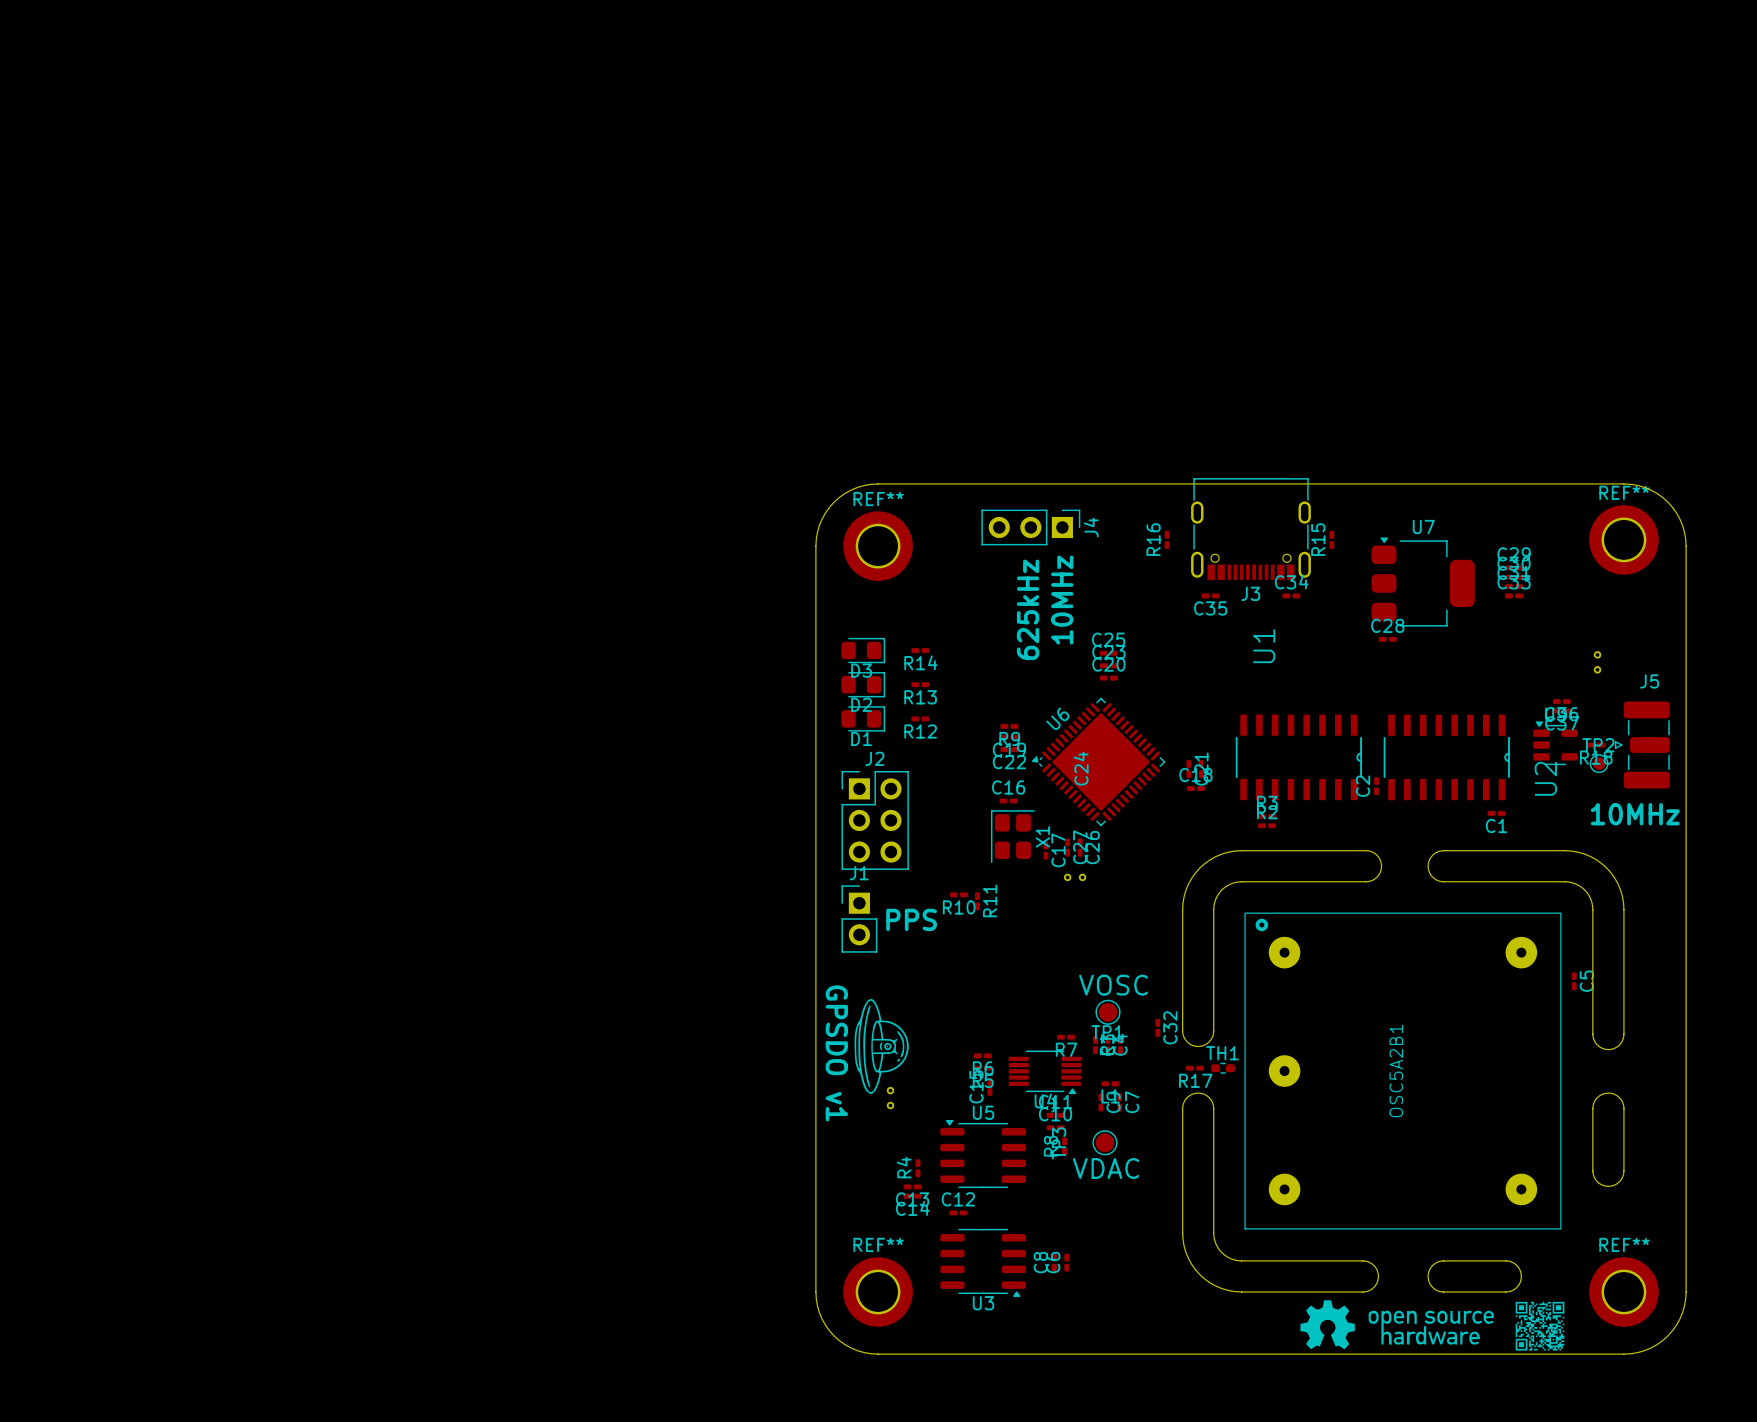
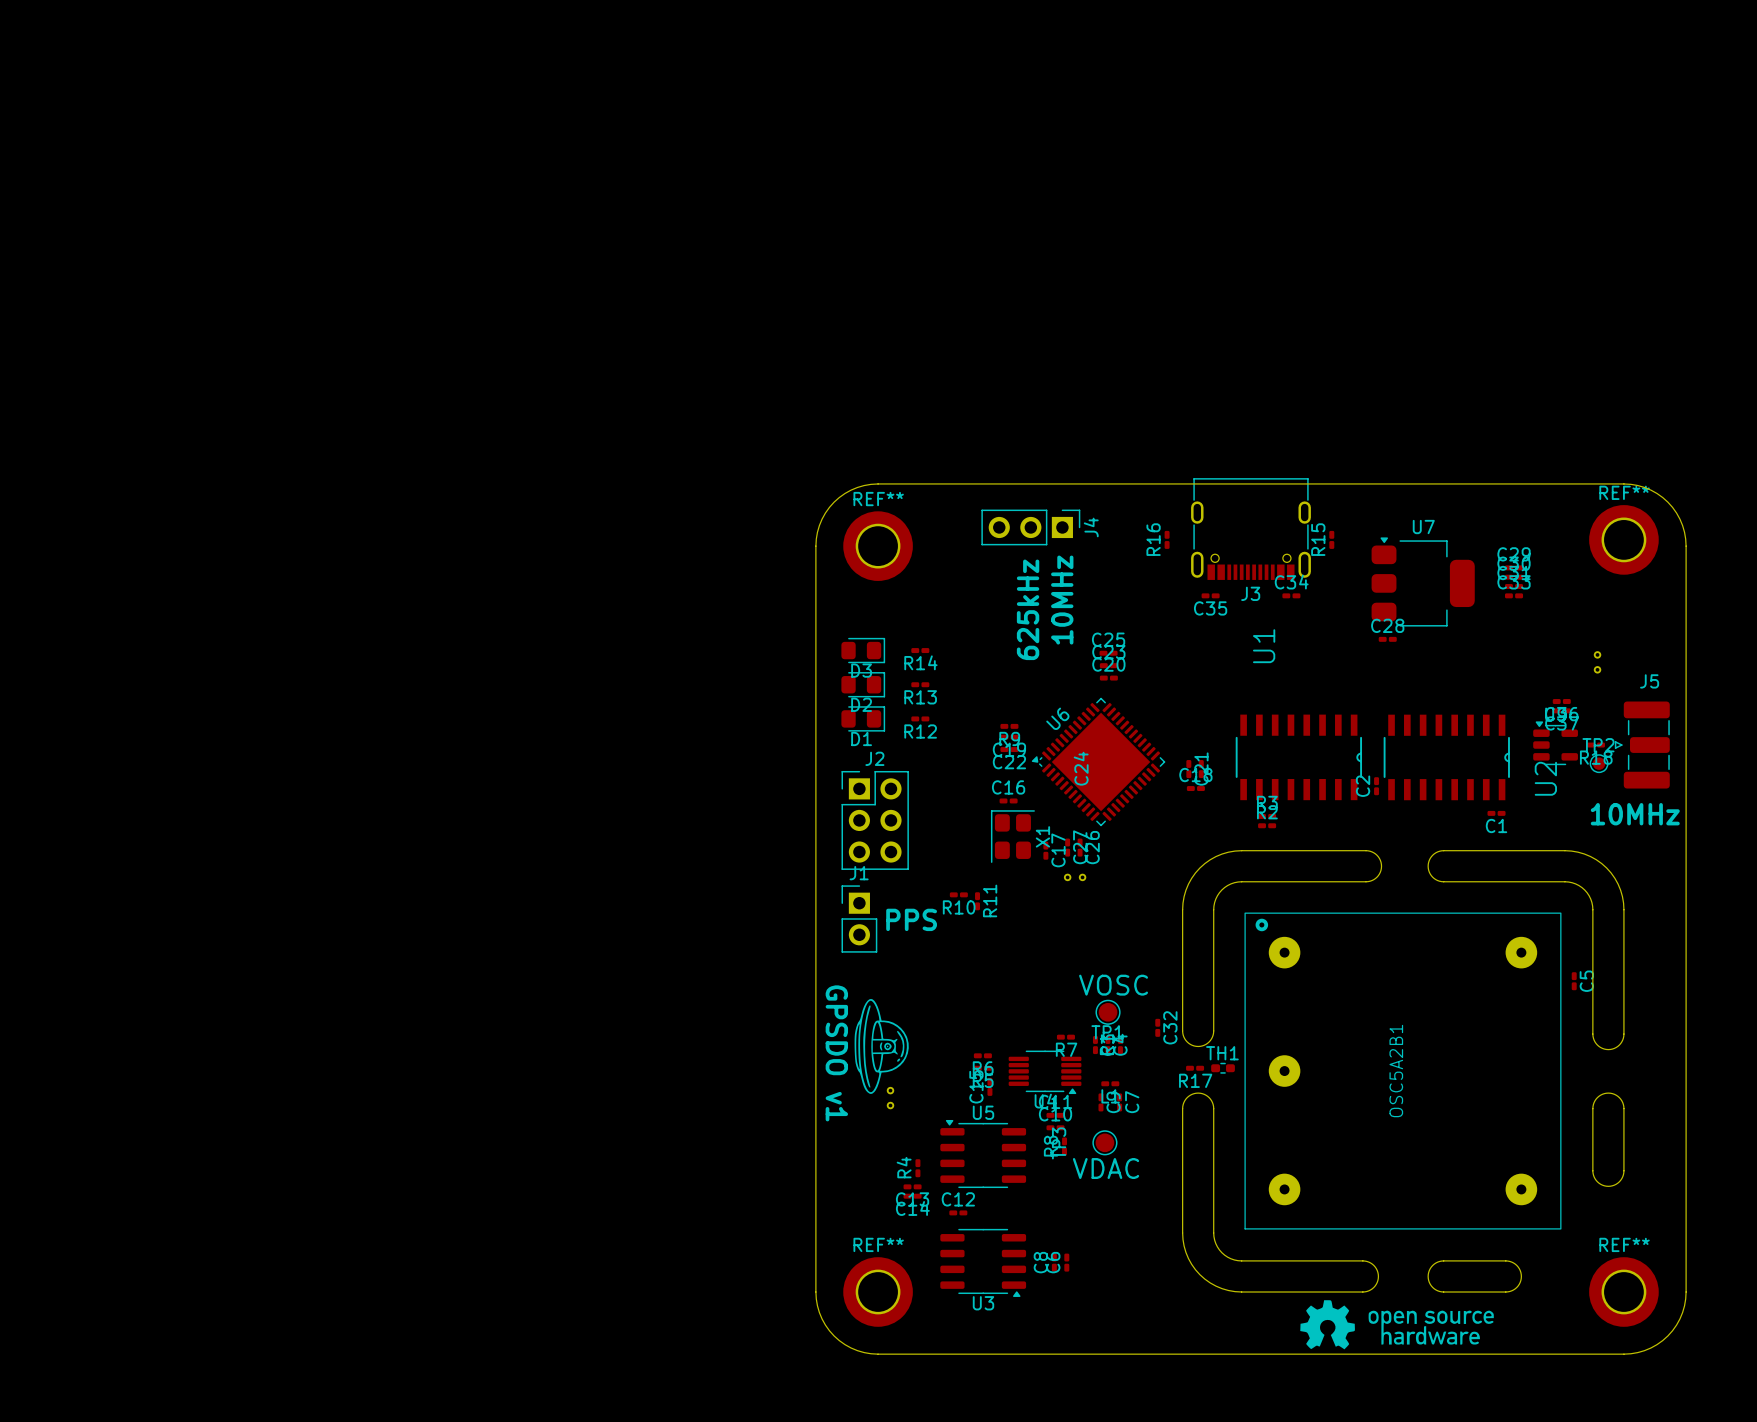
drawing: [1515, 1301, 1565, 1351] -> none

